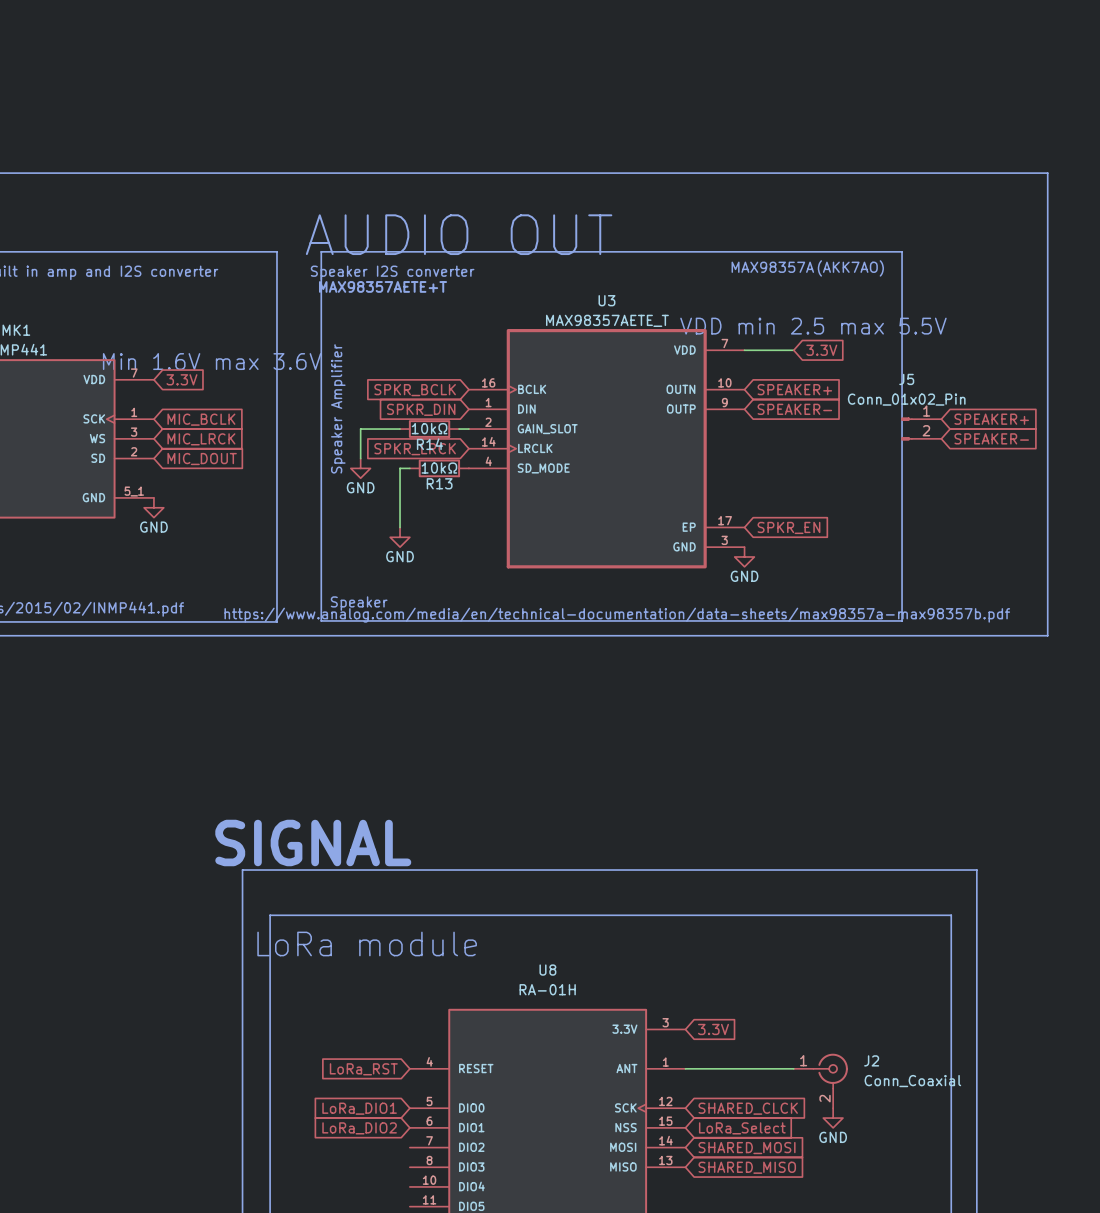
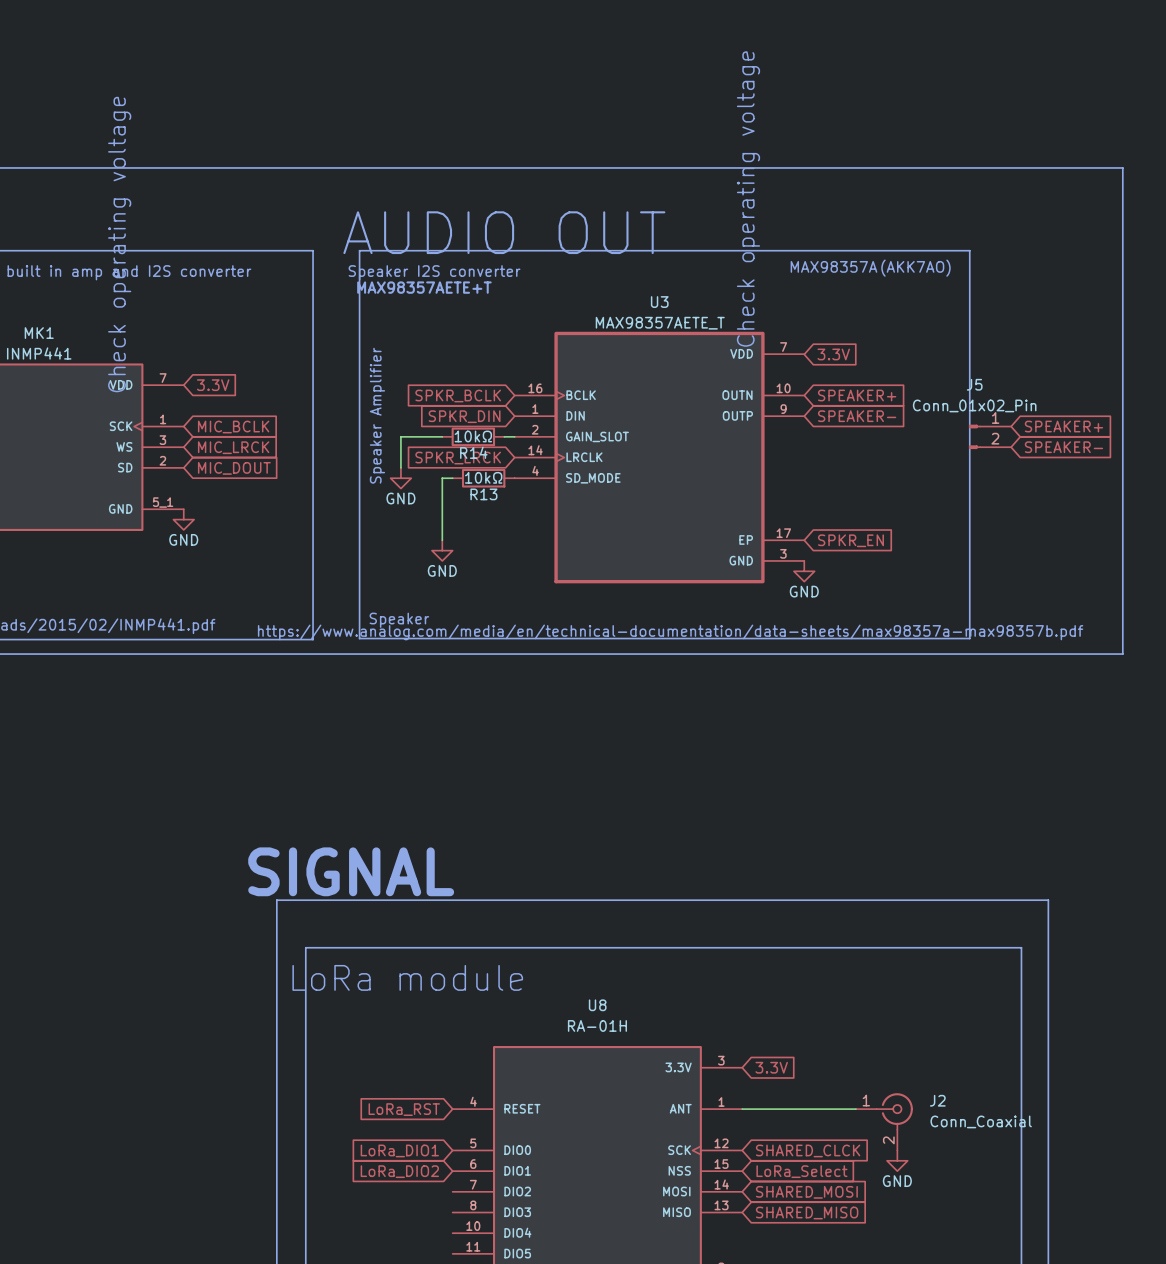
text: none -> Check operating voltage (748, 199)
text: none -> Check operating voltage (119, 244)
text: VDD min 2.5 max 5.5V (813, 326) -> none
wire: (744, 350) (793, 350) -> none
global label position: 3.3V (821, 350) -> 3.3V (833, 354)
text: Min 1.6V max 3.6V (212, 361) -> none

